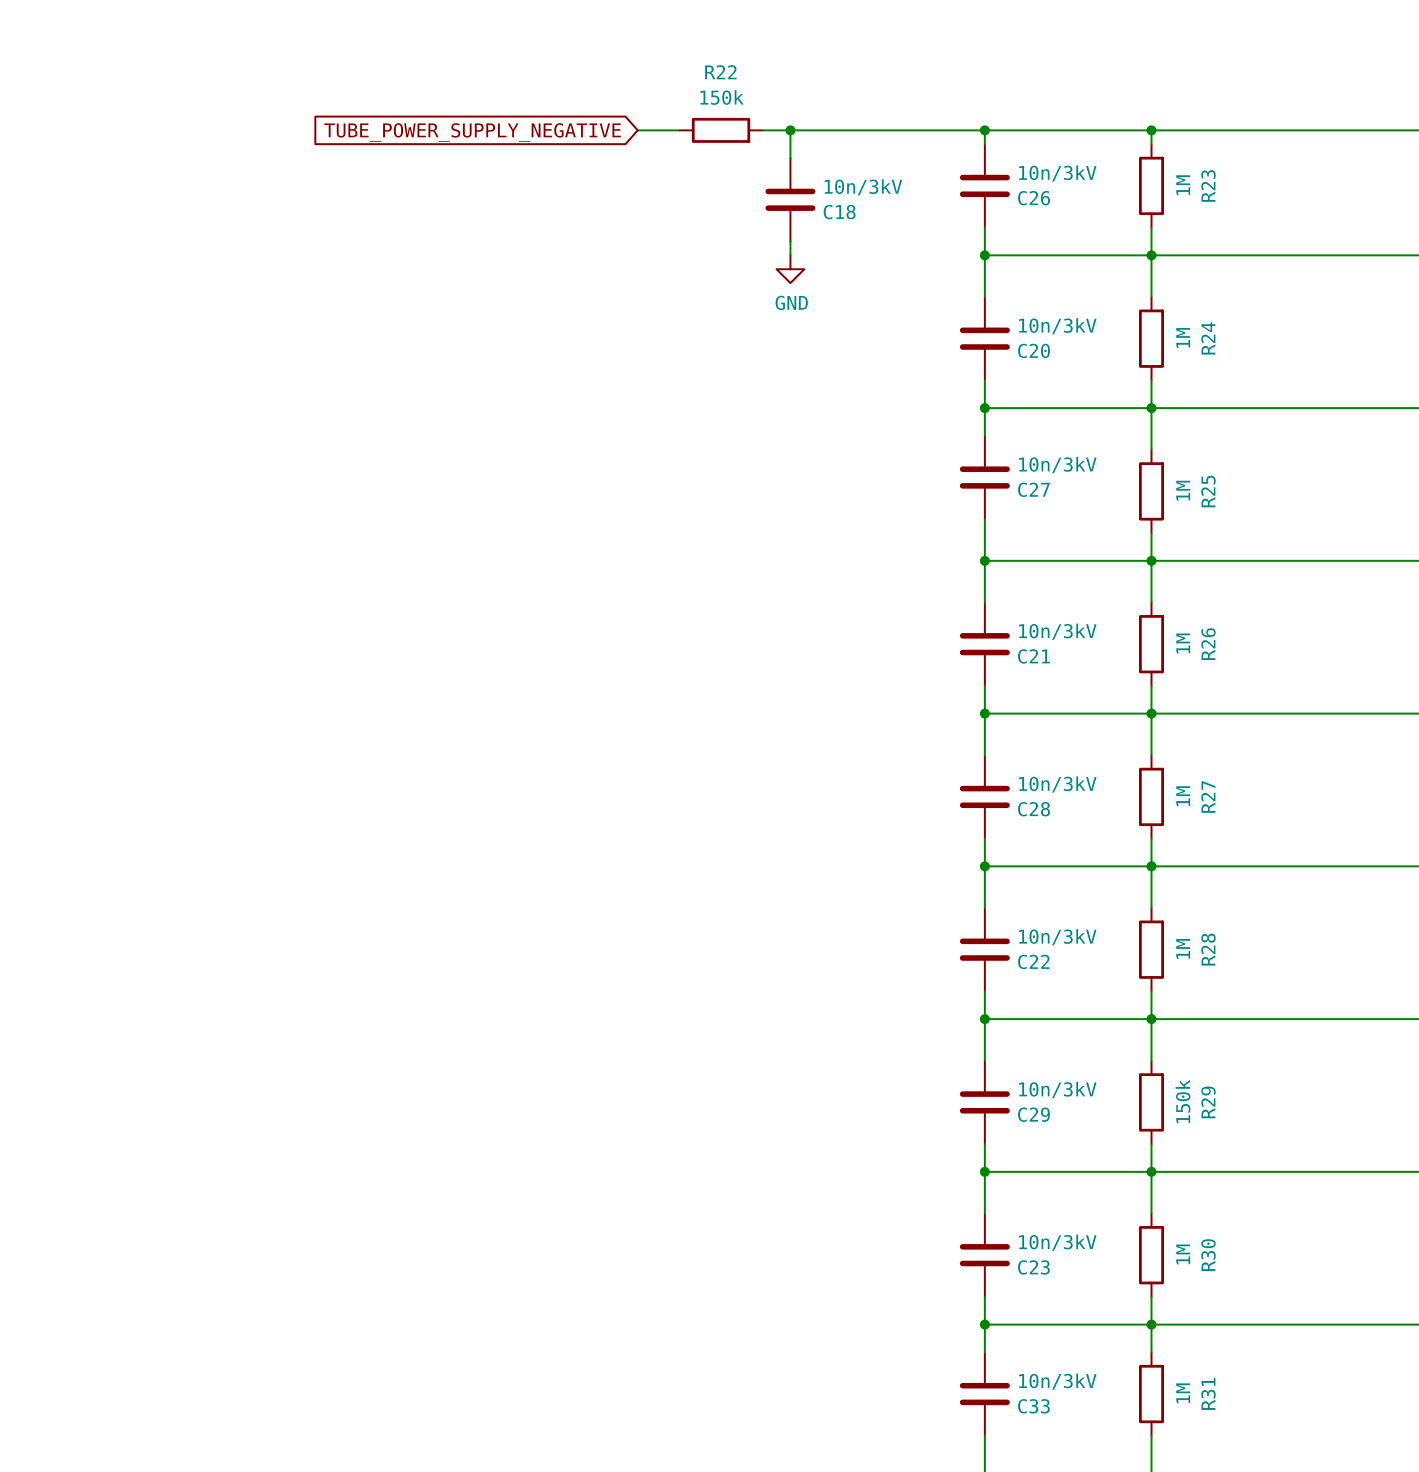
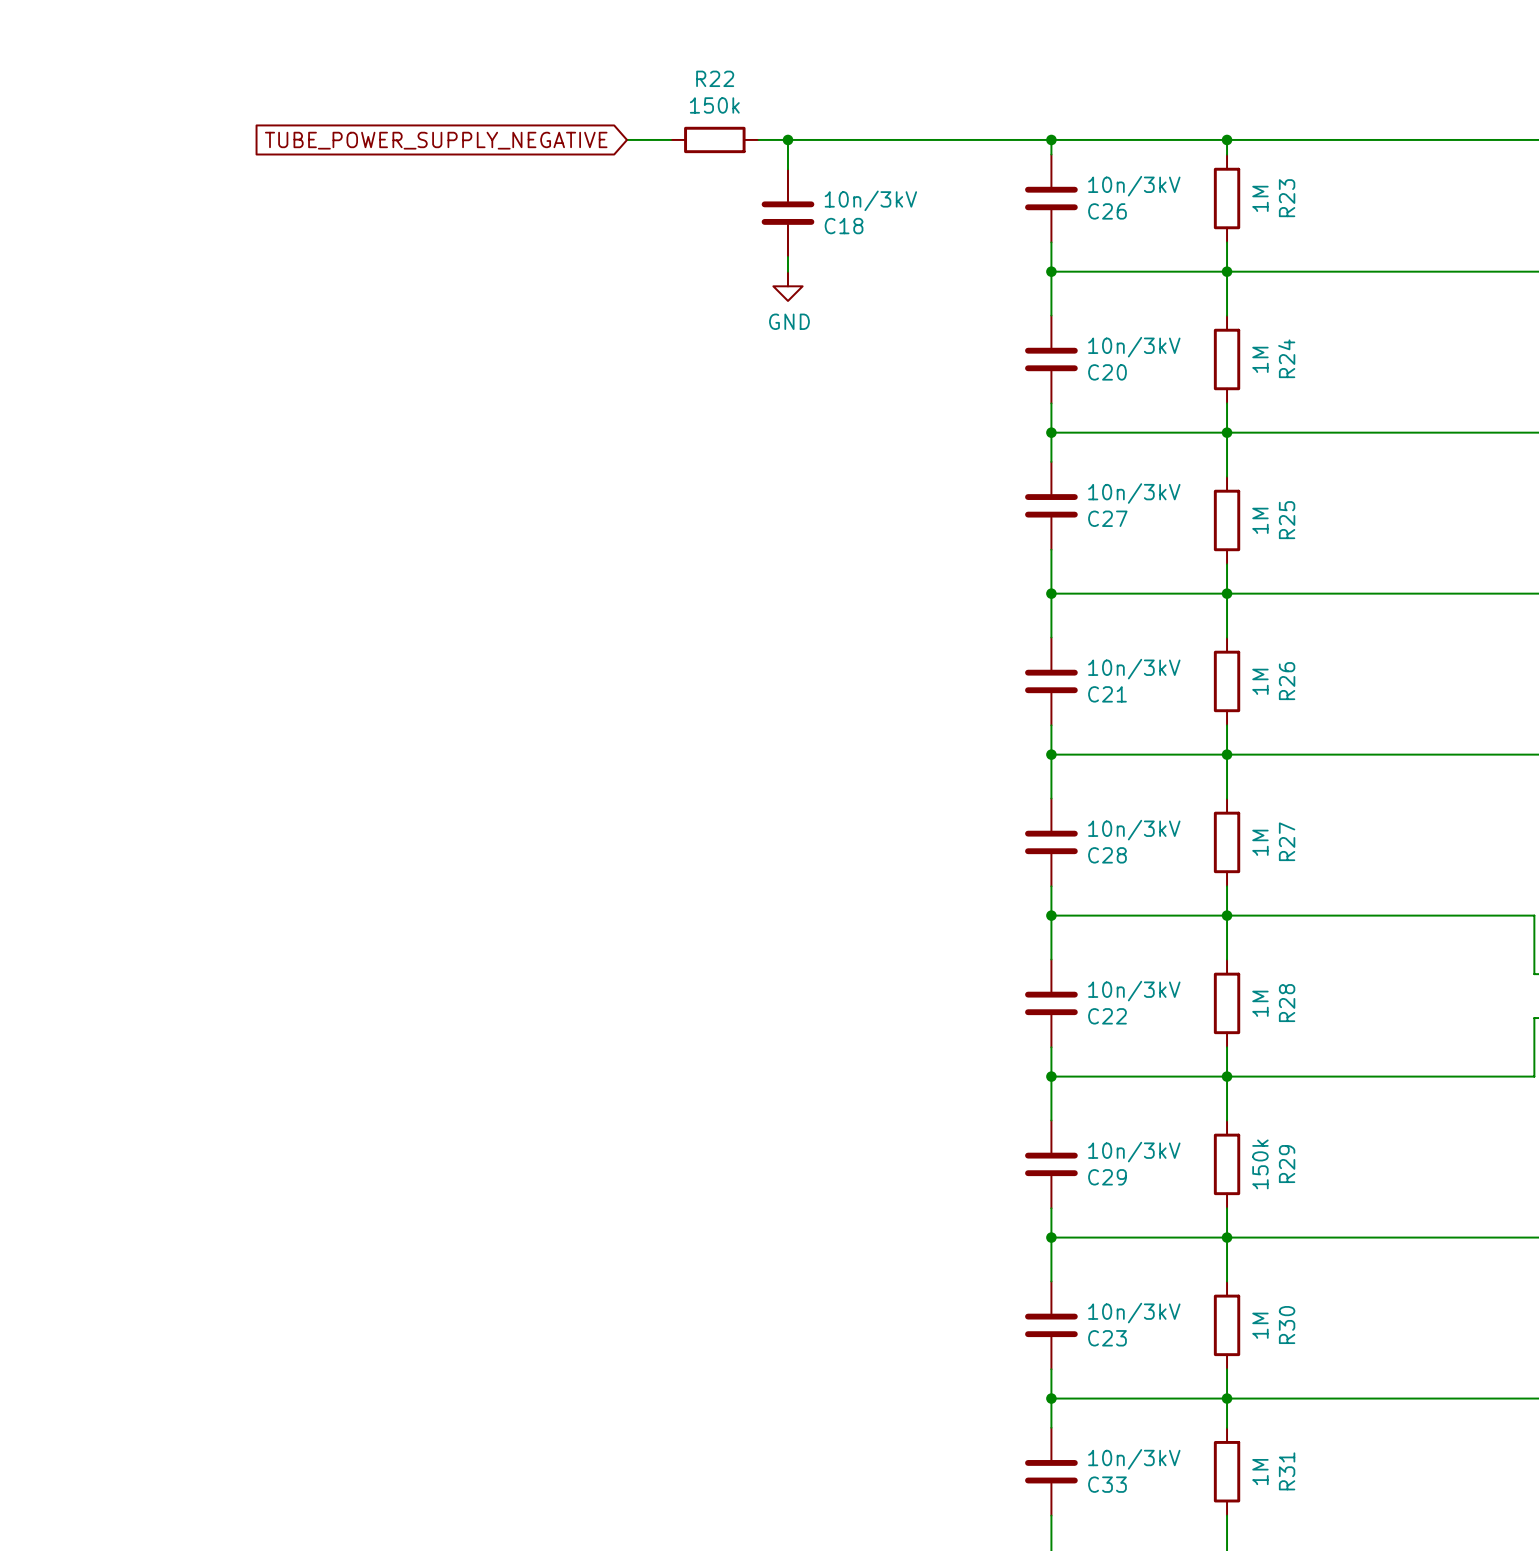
wire: (637, 130) (679, 130) -> (627, 139) (670, 139)
wire: none -> (758, 139) (817, 139)
R22 position: (721, 130) -> (714, 139)
wire: (790, 130) (790, 158) -> (787, 139) (787, 169)
junction position: (790, 130) -> (787, 139)
global label position: TUBE_POWER_SUPPLY_NEGATIVE (472, 132) -> TUBE_POWER_SUPPLY_NEGATIVE (436, 140)
C18 position: (790, 199) -> (787, 213)
wire: (790, 241) (790, 255) -> (787, 257) (787, 271)
power symbol position: GND (790, 269) -> GND (787, 286)

